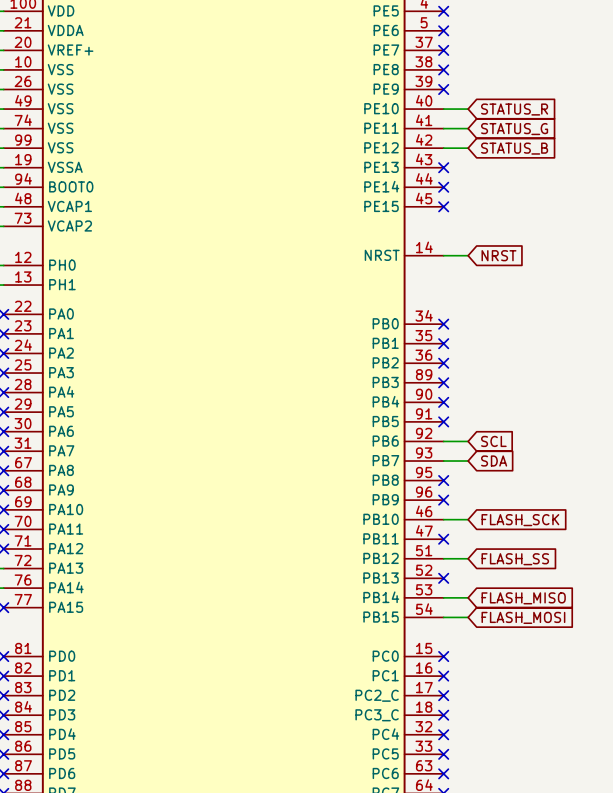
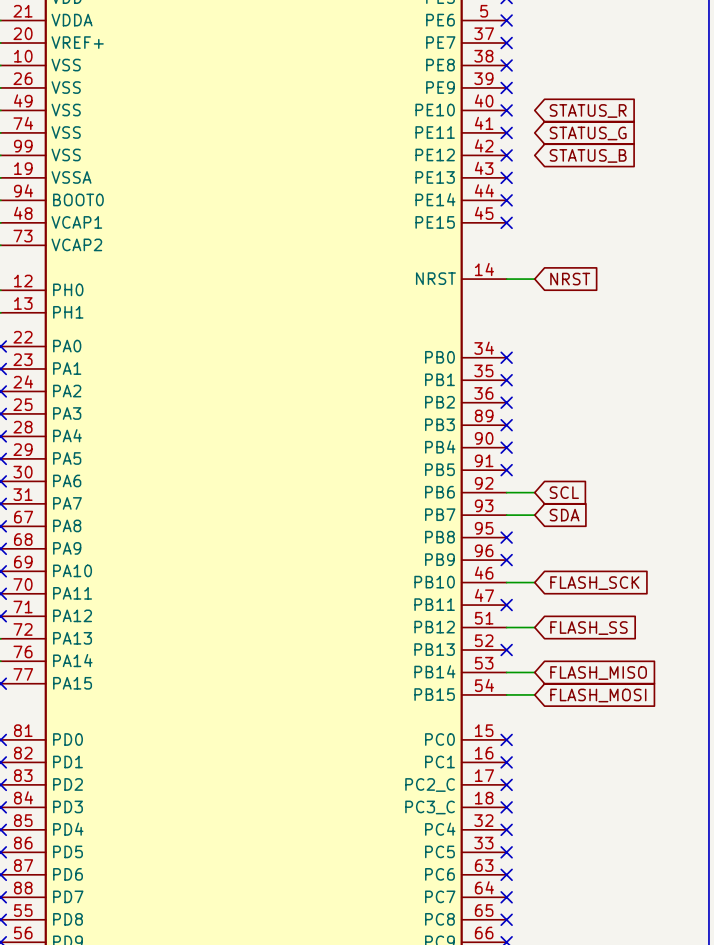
wire: (443, 109) (468, 109) -> none
no-connect mark: none -> (506, 110)
wire: (443, 128) (468, 128) -> none
no-connect mark: none -> (506, 132)
wire: (443, 148) (468, 148) -> none
no-connect mark: none -> (506, 155)

